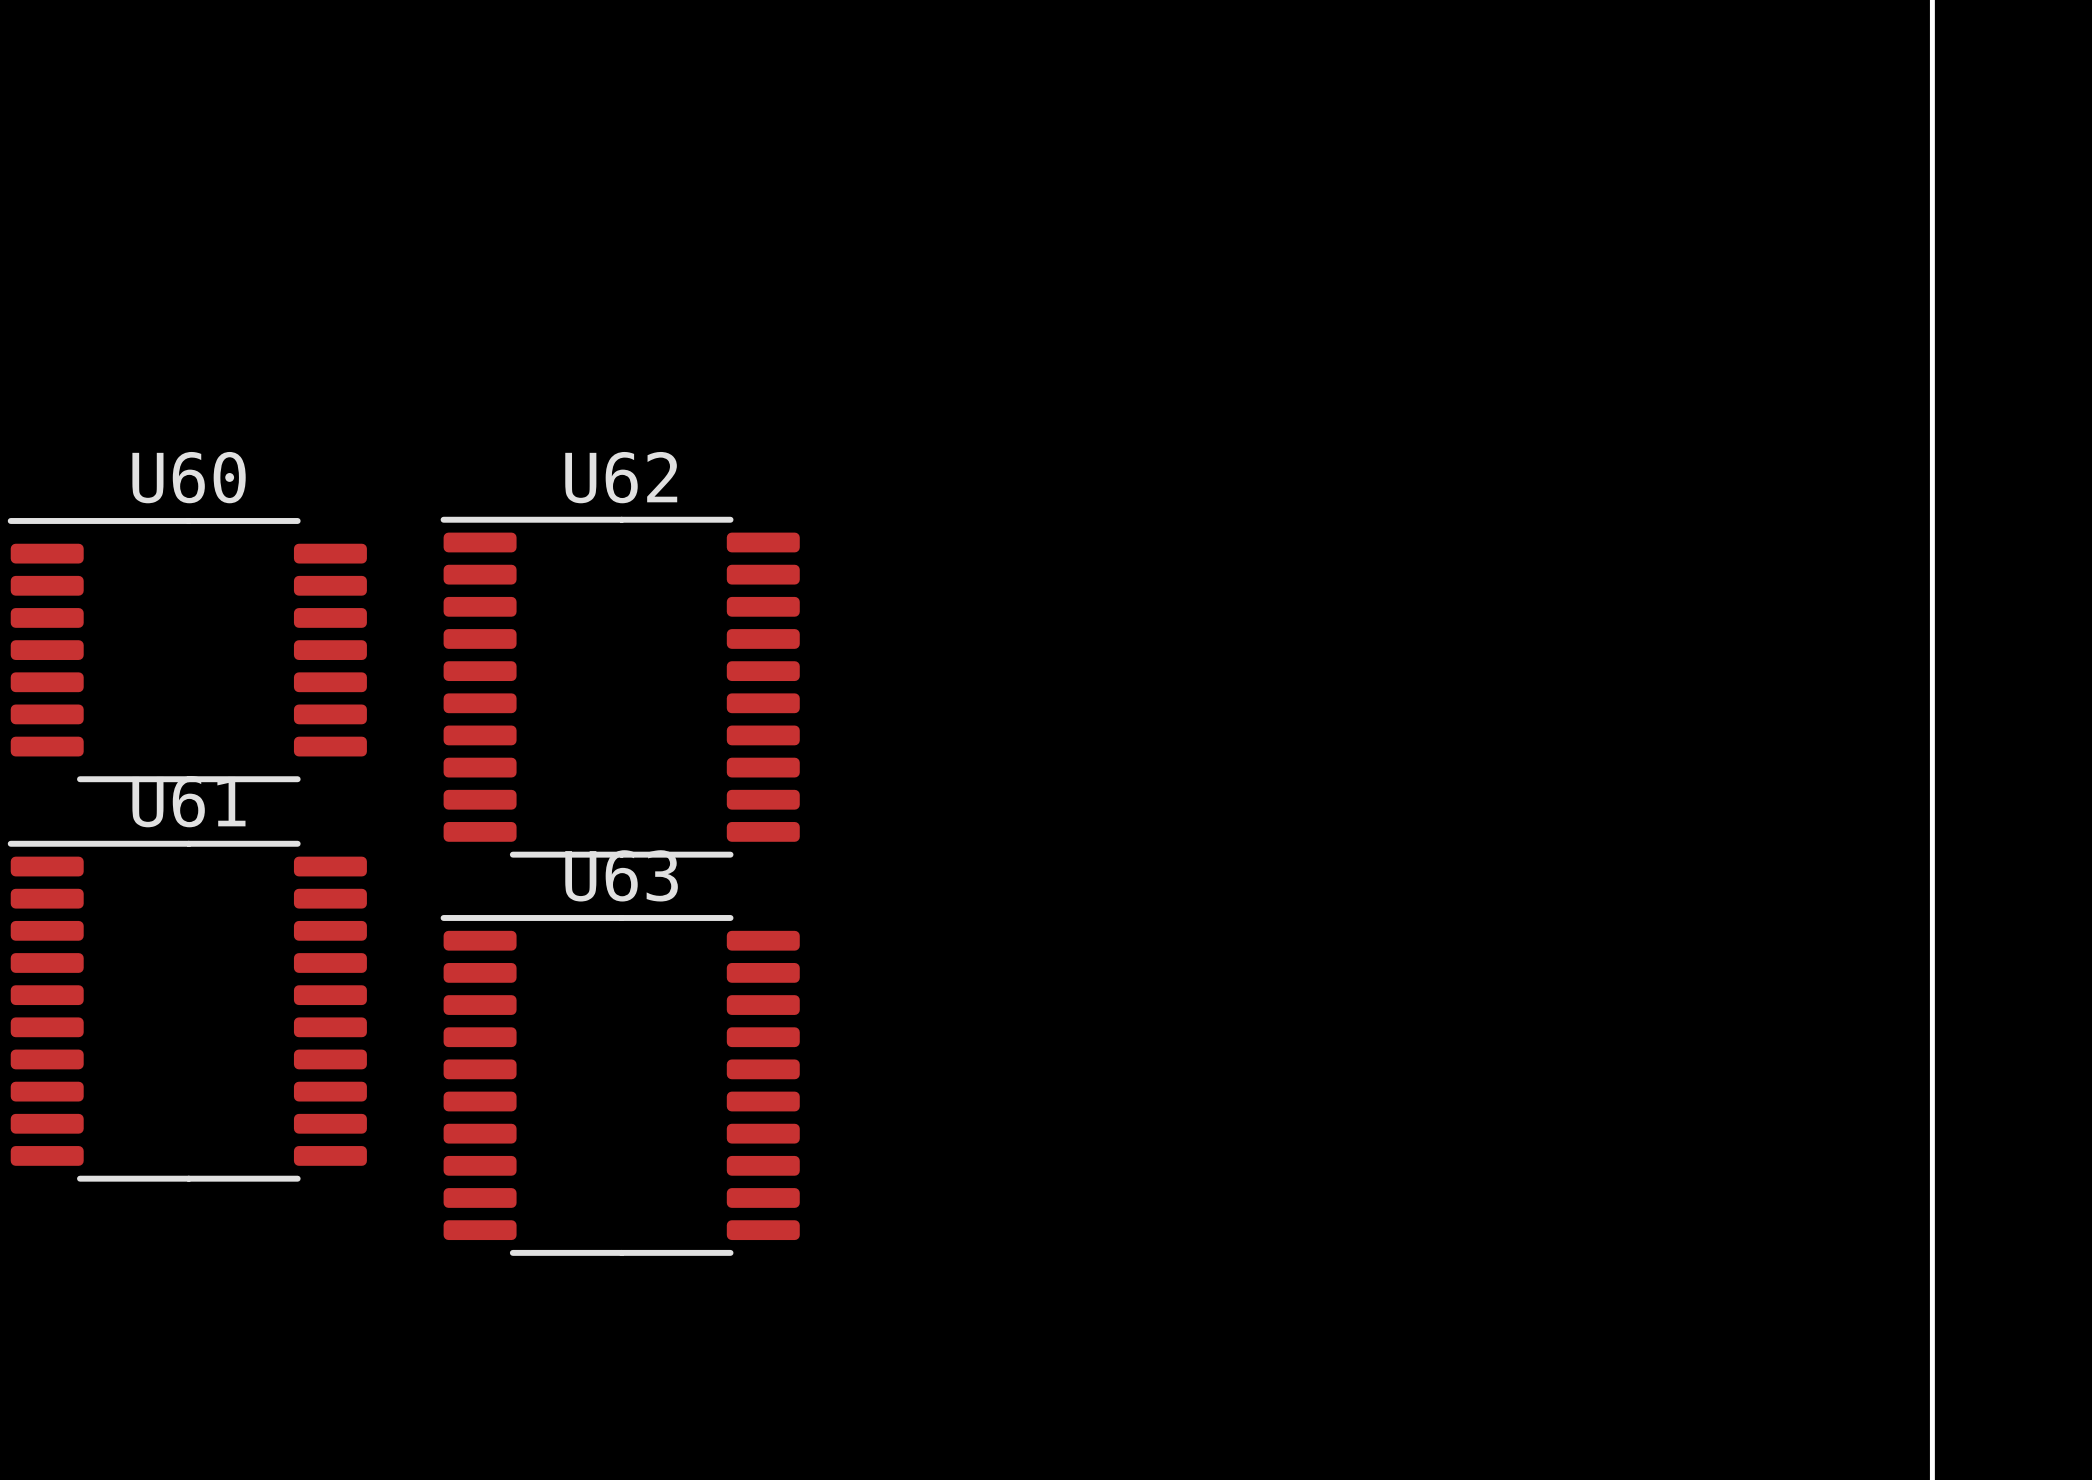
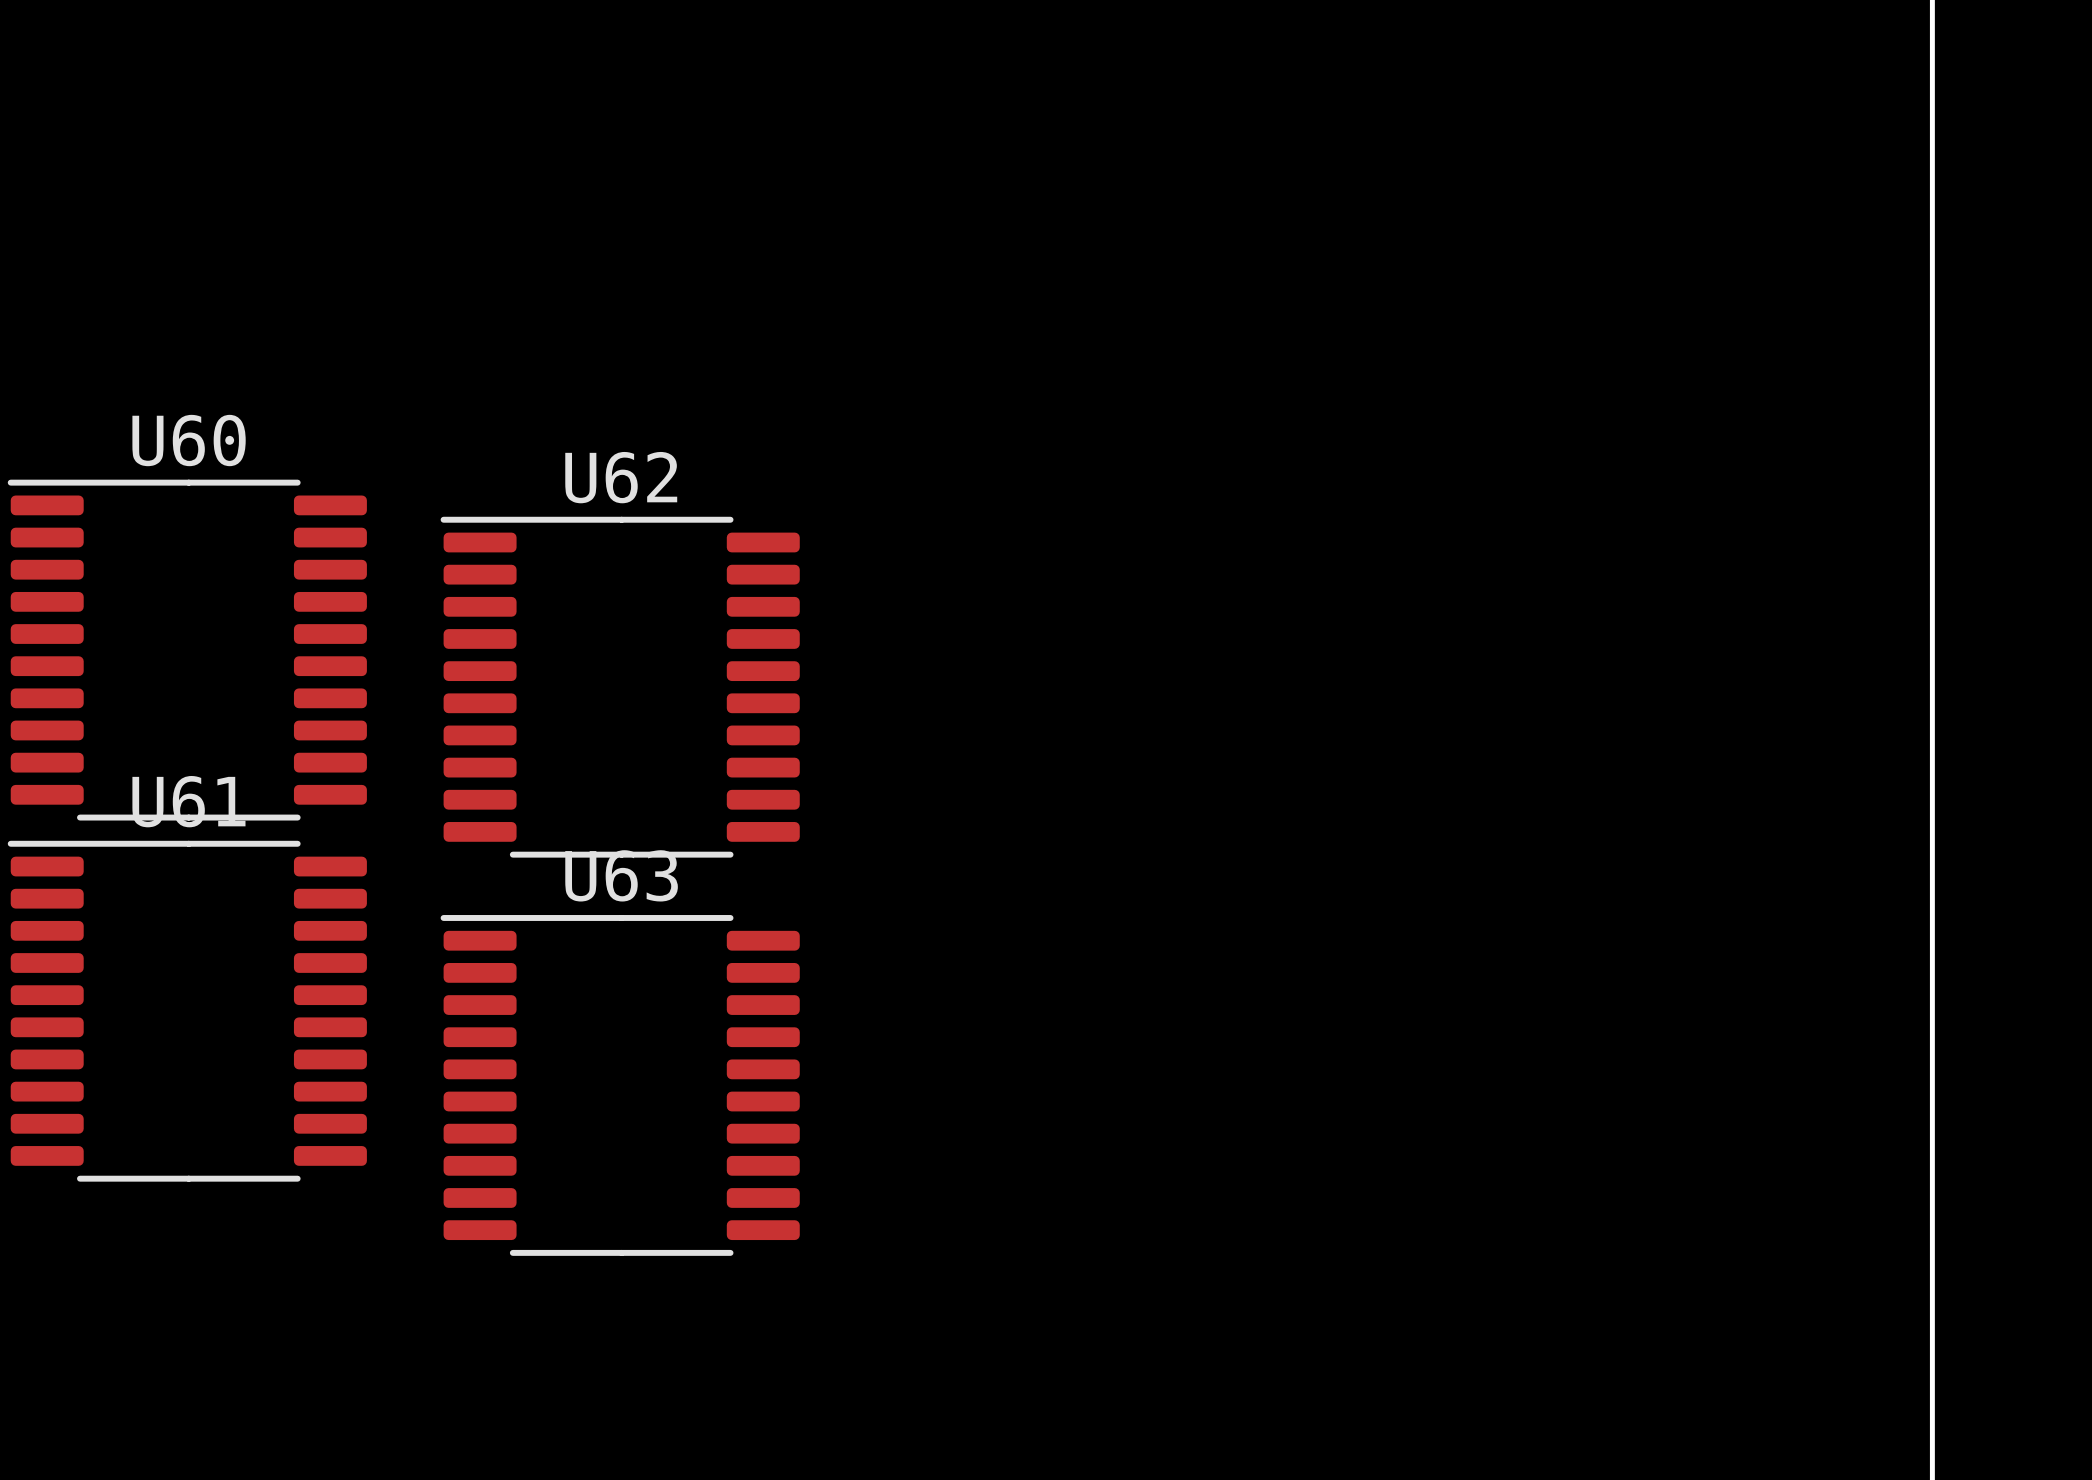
U60 name position: U60 (189, 477) -> U60 (189, 440)
U60 footprint: [7, 518, 367, 783] -> [7, 479, 367, 821]

